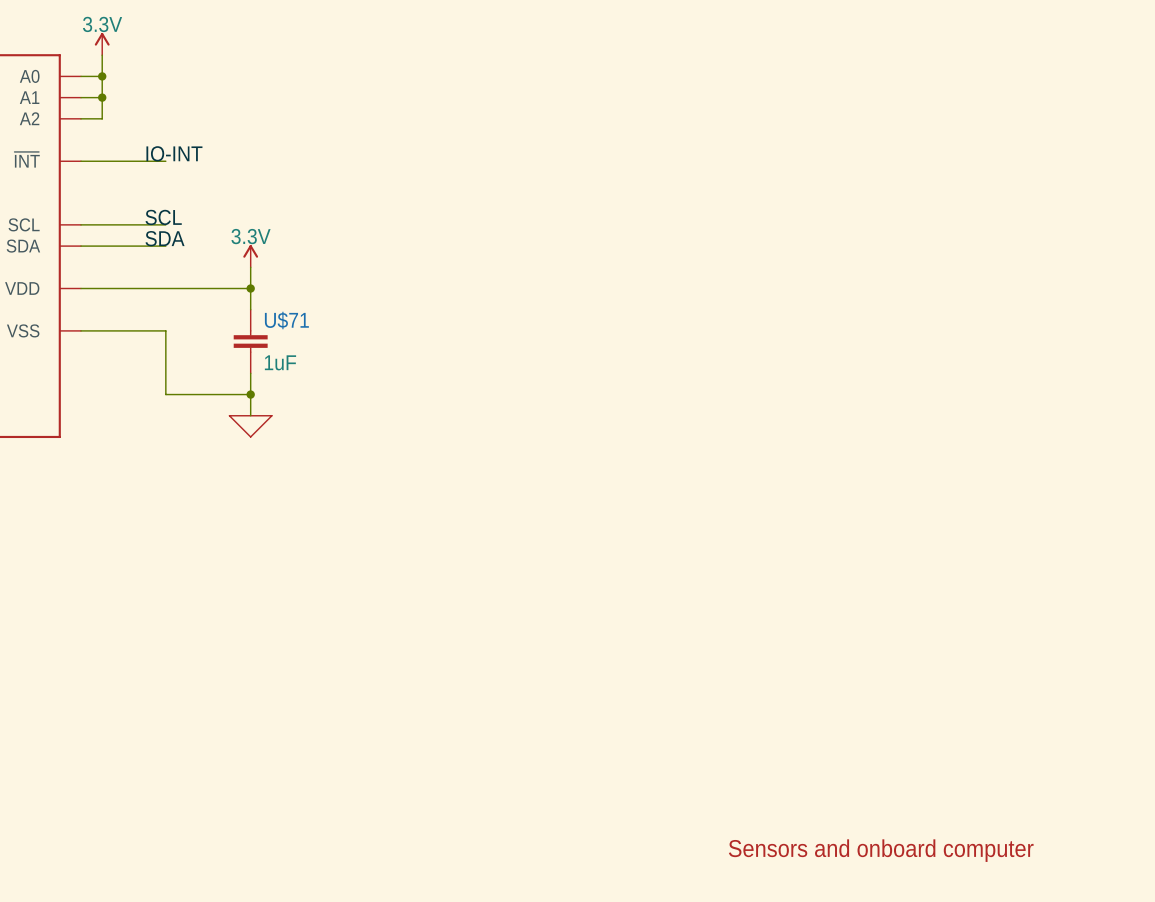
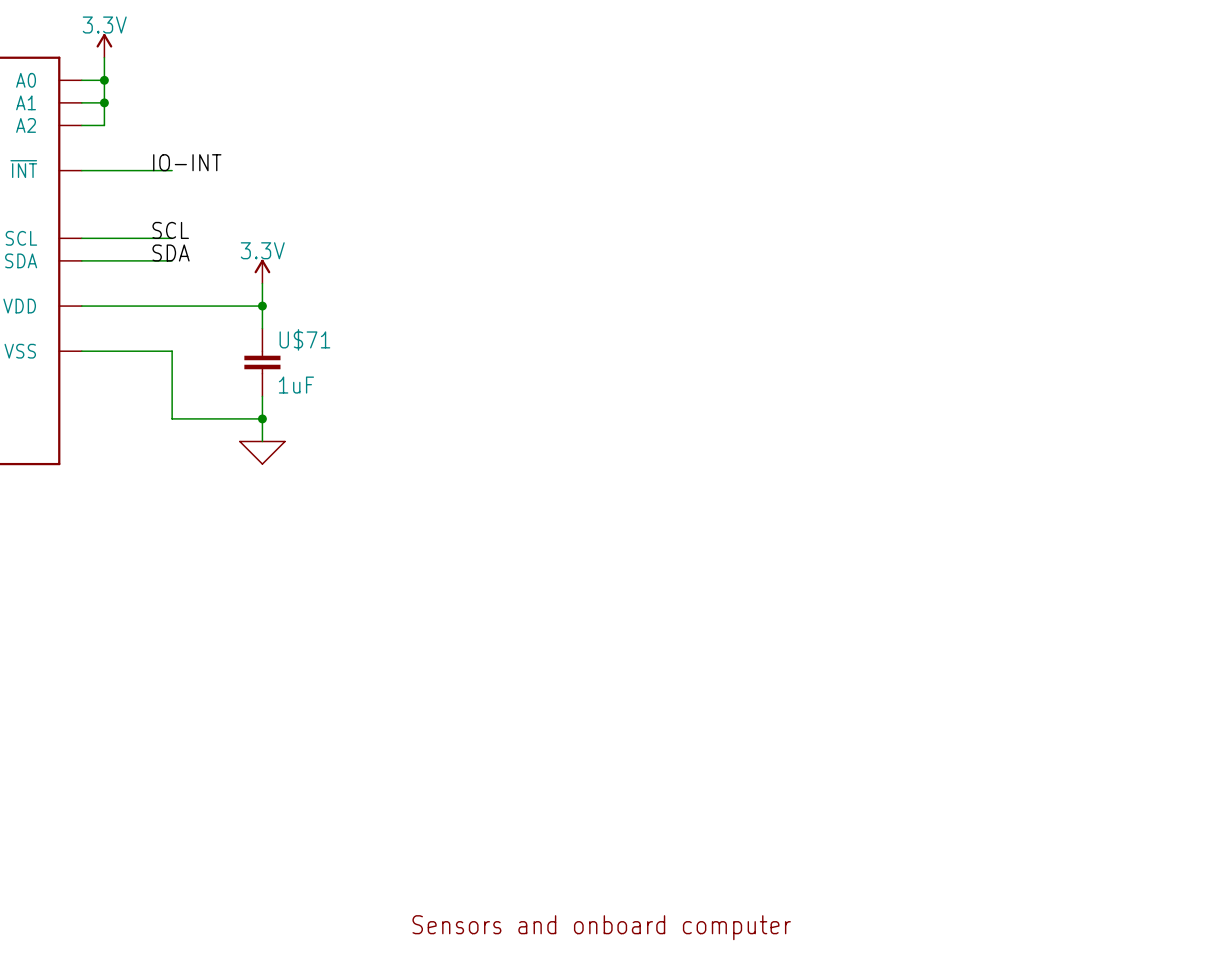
text: Sensors and onboard computer (881, 850) -> none
text: none -> Sensors and onboard computer (601, 927)

